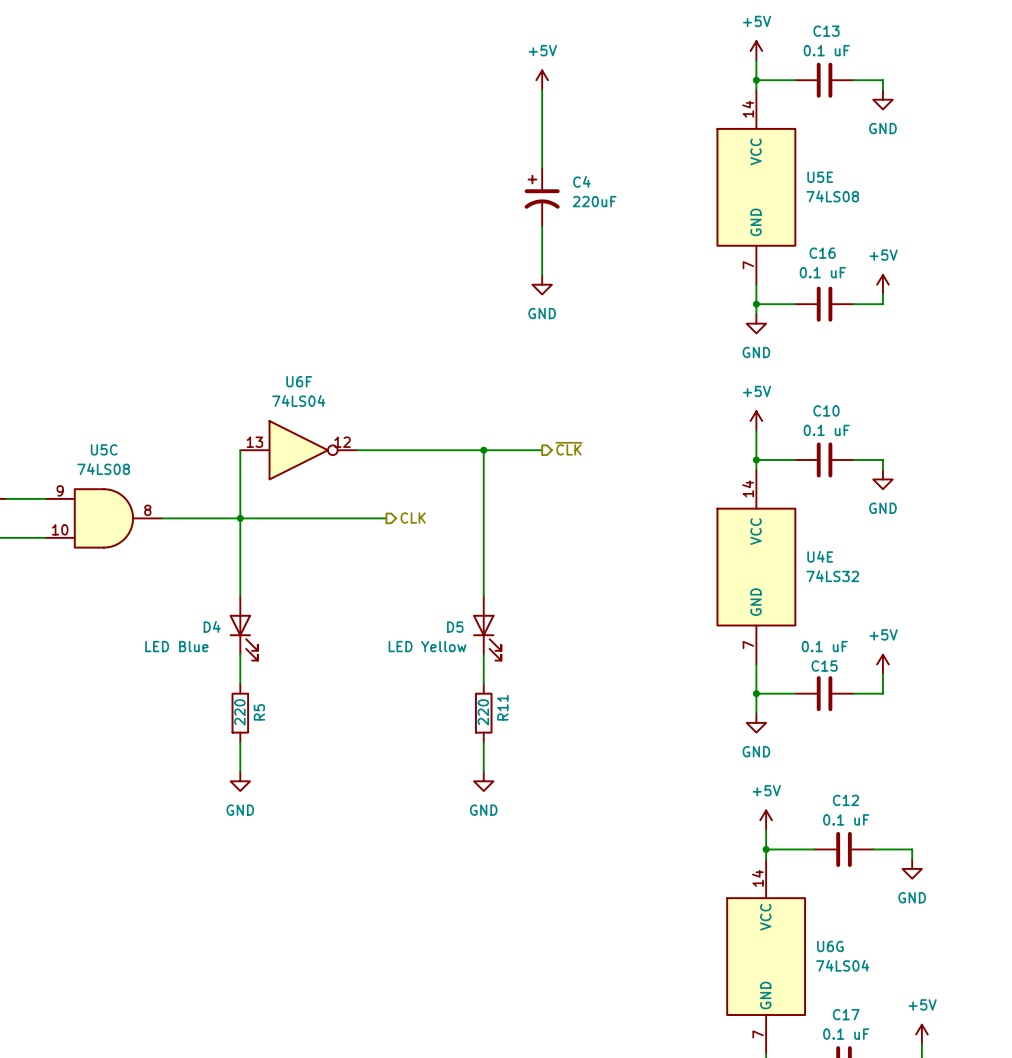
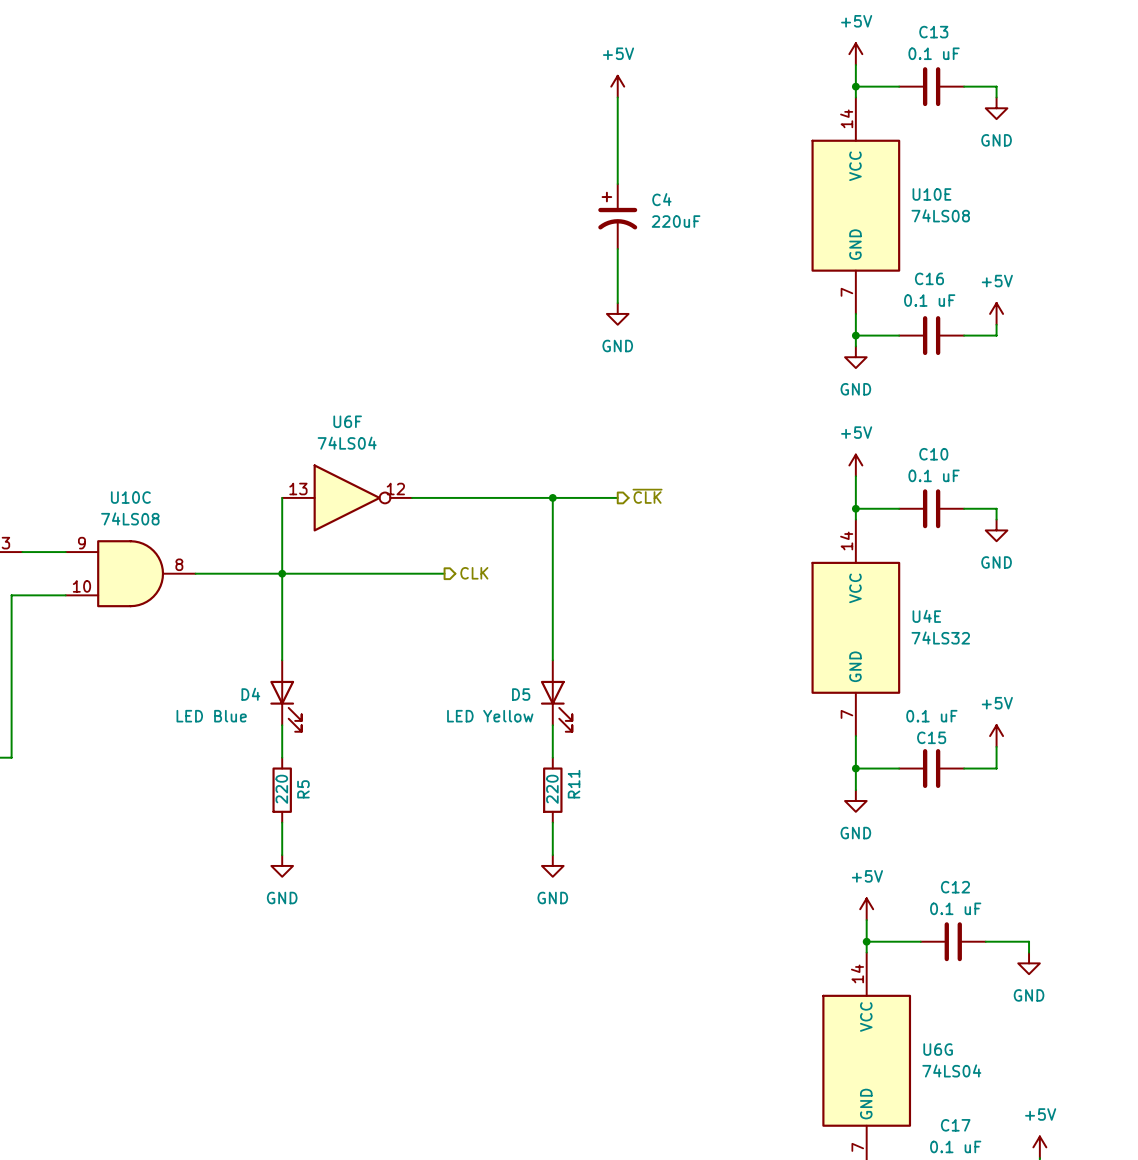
U5E name: U5E (820, 177) -> U10E (931, 194)
U5C name: U5C (104, 449) -> U10C (130, 497)

